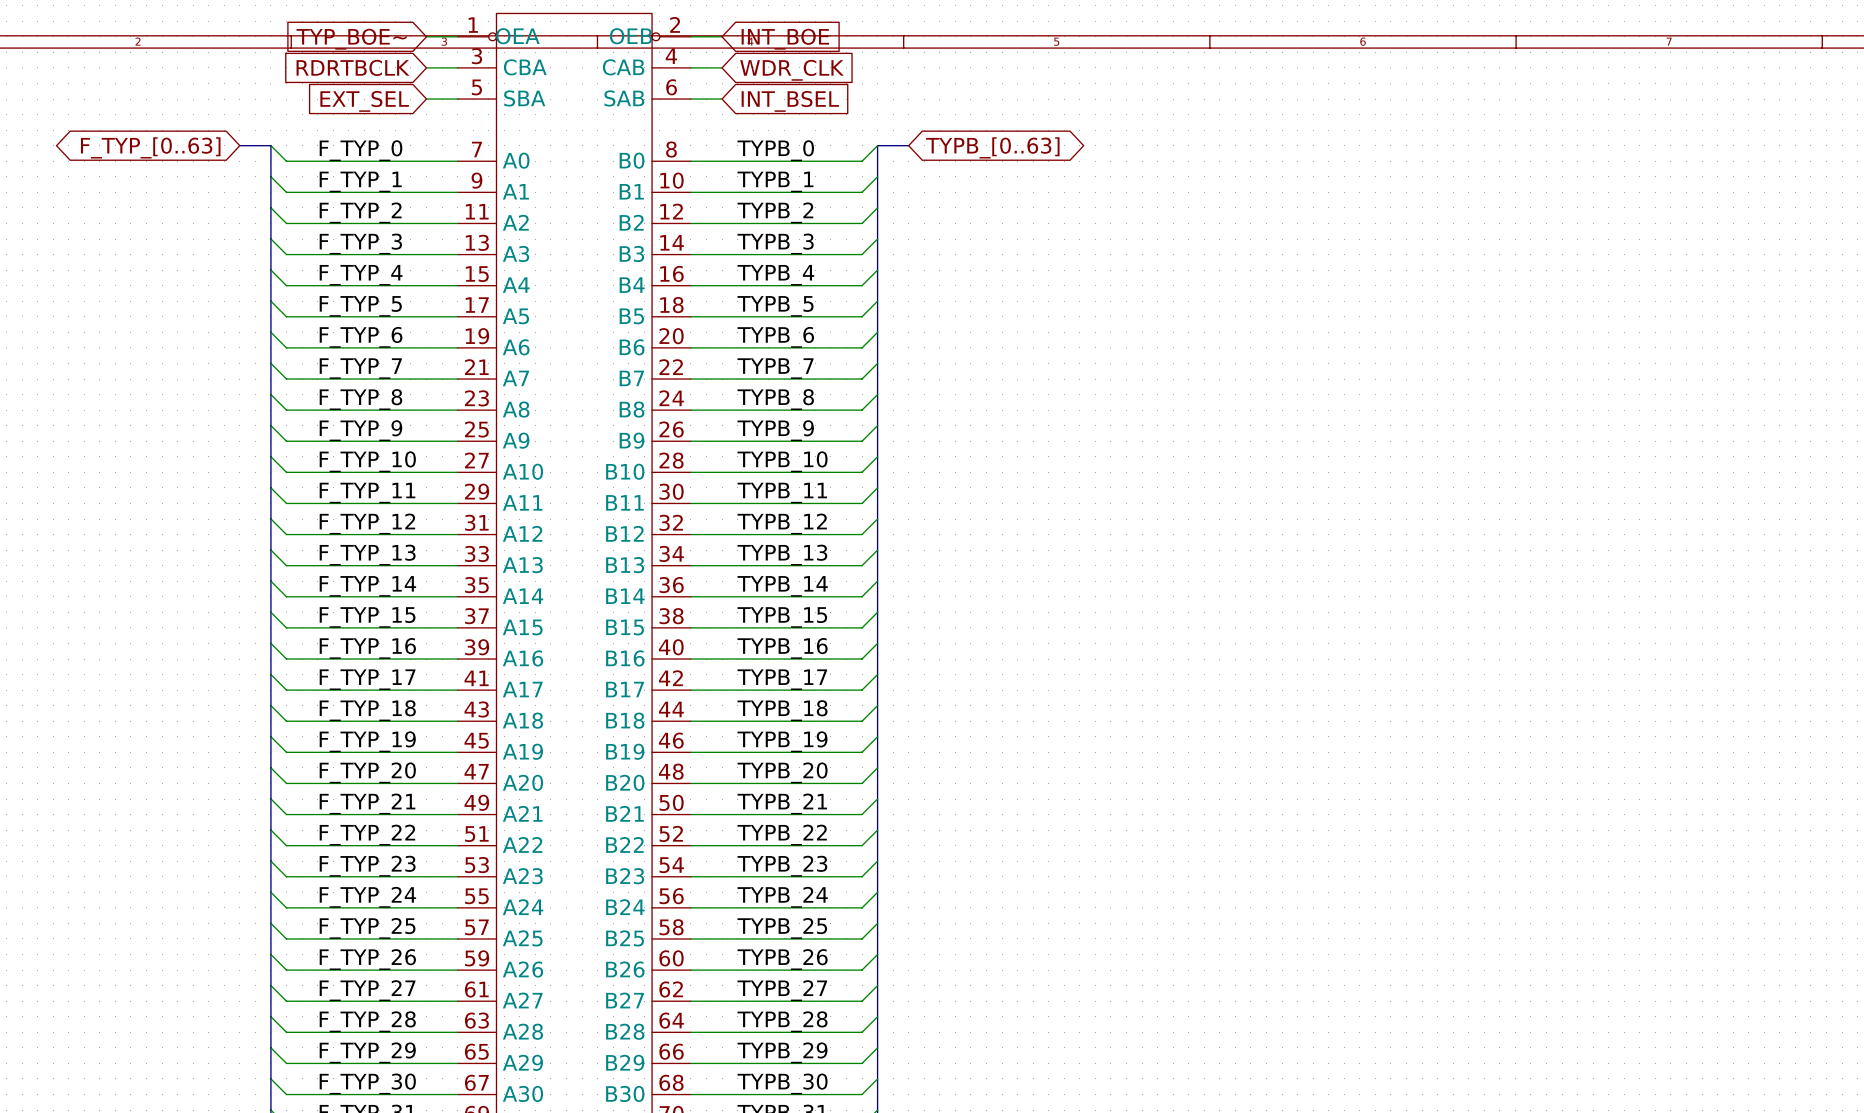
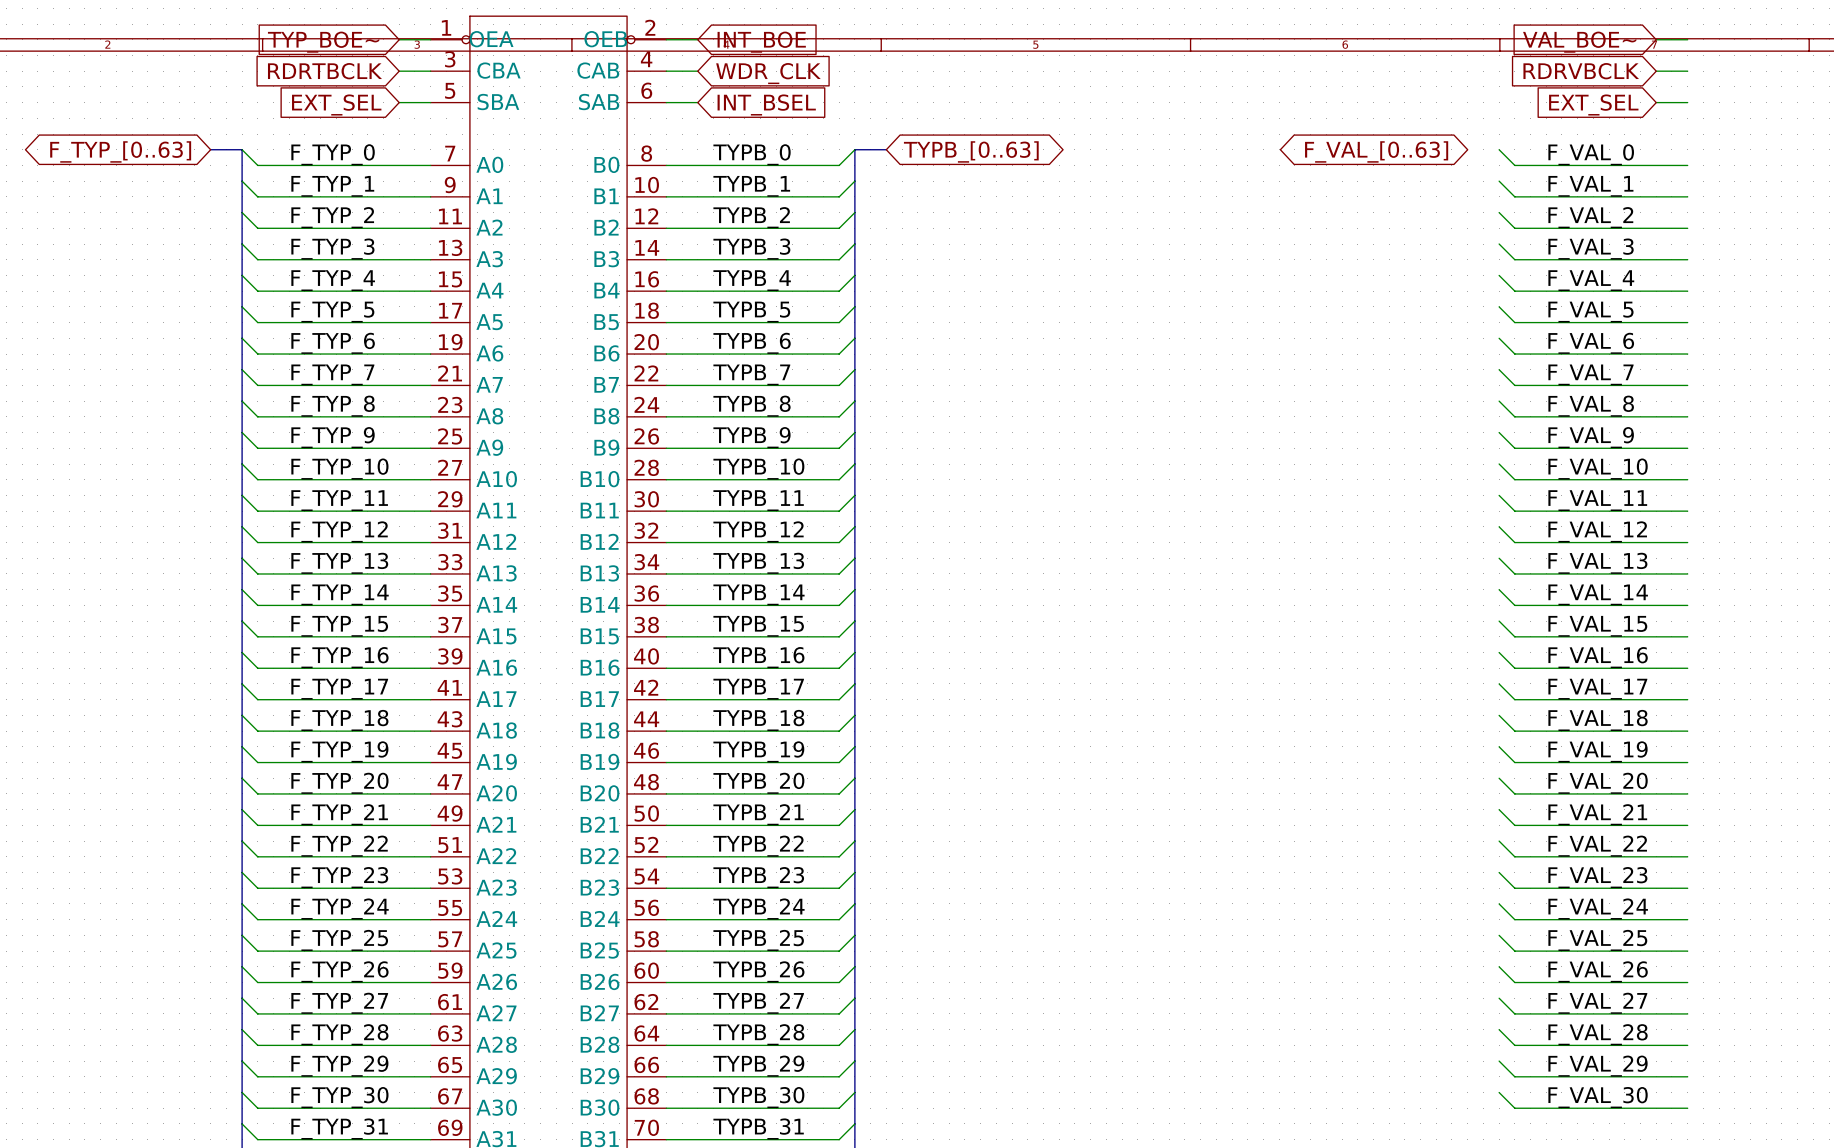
wire: none -> (1656, 39) (1687, 39)
global label: none -> VAL_BOE~ (1579, 42)
global label: none -> RDRVBCLK (1581, 71)
wire: none -> (1656, 71) (1687, 71)
wire: none -> (1656, 102) (1687, 102)
global label: none -> EXT_SEL (1593, 105)
wire: none -> (1499, 149) (1514, 165) (1687, 165)
global label: none -> F_VAL_[0..63] (1376, 151)
label: none -> F_VAL_0 (1591, 154)
wire: none -> (1499, 181) (1514, 196) (1687, 196)
label: none -> F_VAL_1 (1590, 186)
wire: none -> (1499, 212) (1514, 228) (1687, 228)
label: none -> F_VAL_2 (1590, 217)
wire: none -> (1499, 244) (1514, 259) (1687, 259)
label: none -> F_VAL_3 (1591, 249)
wire: none -> (1499, 275) (1514, 291) (1687, 291)
label: none -> F_VAL_4 (1591, 280)
wire: none -> (1499, 306) (1514, 322) (1687, 322)
label: none -> F_VAL_5 (1590, 312)
wire: none -> (1499, 338) (1514, 354) (1687, 354)
label: none -> F_VAL_6 (1591, 343)
wire: none -> (1499, 369) (1514, 385) (1687, 385)
label: none -> F_VAL_7 (1590, 374)
wire: none -> (1499, 401) (1514, 416) (1687, 416)
label: none -> F_VAL_8 (1591, 406)
wire: none -> (1499, 432) (1514, 448) (1687, 448)
label: none -> F_VAL_9 (1591, 437)
wire: none -> (1499, 464) (1514, 479) (1687, 479)
label: none -> F_VAL_10 (1598, 469)
wire: none -> (1499, 495) (1514, 511) (1687, 511)
label: none -> F_VAL_11 (1597, 500)
wire: none -> (1499, 526) (1514, 542) (1687, 542)
label: none -> F_VAL_12 (1597, 531)
wire: none -> (1499, 558) (1514, 573) (1687, 573)
label: none -> F_VAL_13 (1597, 563)
wire: none -> (1499, 589) (1514, 605) (1687, 605)
label: none -> F_VAL_14 (1598, 594)
wire: none -> (1499, 621) (1514, 636) (1687, 636)
label: none -> F_VAL_15 (1597, 626)
wire: none -> (1499, 652) (1514, 668) (1687, 668)
label: none -> F_VAL_16 (1598, 657)
wire: none -> (1499, 683) (1514, 699) (1687, 699)
label: none -> F_VAL_17 (1597, 689)
wire: none -> (1499, 715) (1514, 731) (1687, 731)
label: none -> F_VAL_18 (1598, 720)
wire: none -> (1499, 746) (1514, 762) (1687, 762)
label: none -> F_VAL_19 (1598, 751)
wire: none -> (1499, 778) (1514, 793) (1687, 793)
label: none -> F_VAL_20 (1598, 783)
wire: none -> (1499, 809) (1514, 825) (1687, 825)
label: none -> F_VAL_21 (1597, 814)
wire: none -> (1499, 841) (1514, 856) (1687, 856)
label: none -> F_VAL_22 (1597, 846)
wire: none -> (1499, 872) (1514, 888) (1687, 888)
label: none -> F_VAL_23 (1597, 877)
wire: none -> (1499, 903) (1514, 919) (1687, 919)
label: none -> F_VAL_24 (1598, 909)
wire: none -> (1499, 935) (1514, 951) (1687, 951)
label: none -> F_VAL_25 (1597, 940)
wire: none -> (1499, 966) (1514, 982) (1687, 982)
label: none -> F_VAL_26 (1598, 971)
wire: none -> (1499, 998) (1514, 1013) (1687, 1013)
label: none -> F_VAL_27 (1597, 1003)
wire: none -> (1499, 1029) (1514, 1045) (1687, 1045)
label: none -> F_VAL_28 (1598, 1034)
wire: none -> (1499, 1061) (1514, 1076) (1687, 1076)
label: none -> F_VAL_29 (1598, 1066)
wire: none -> (1499, 1092) (1514, 1108) (1687, 1108)
label: none -> F_VAL_30 (1598, 1097)

